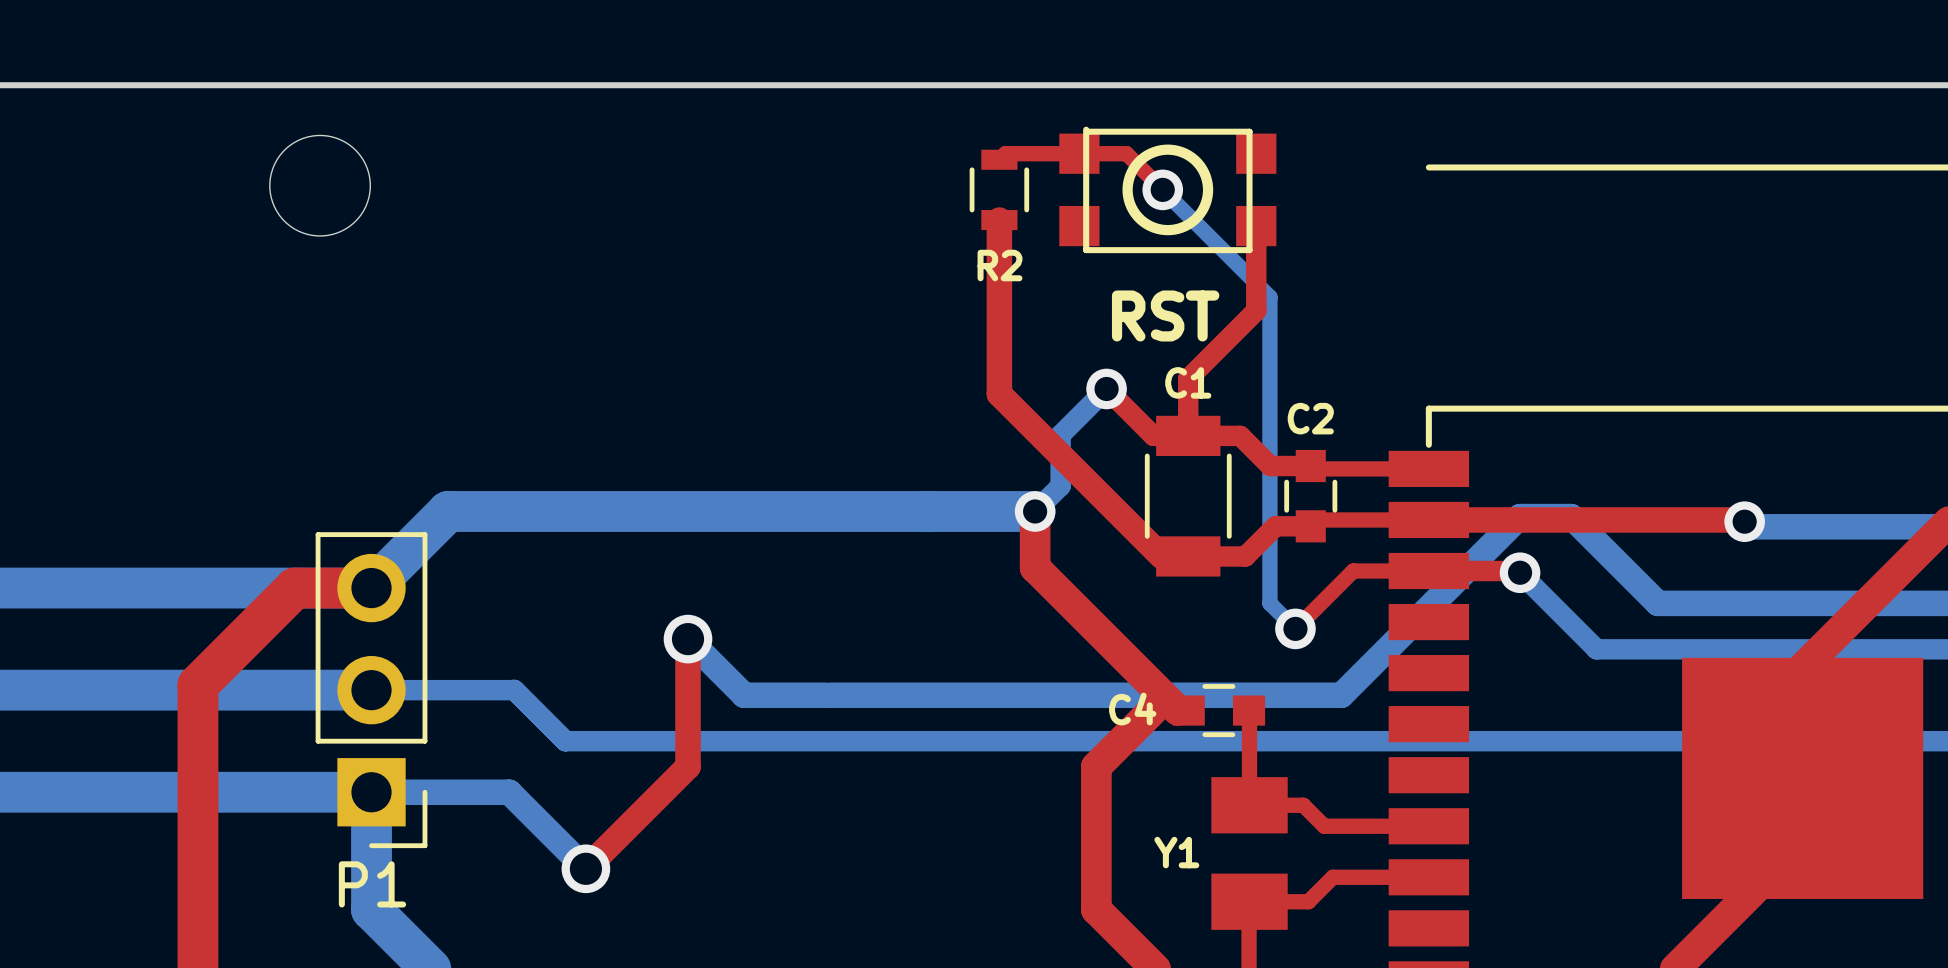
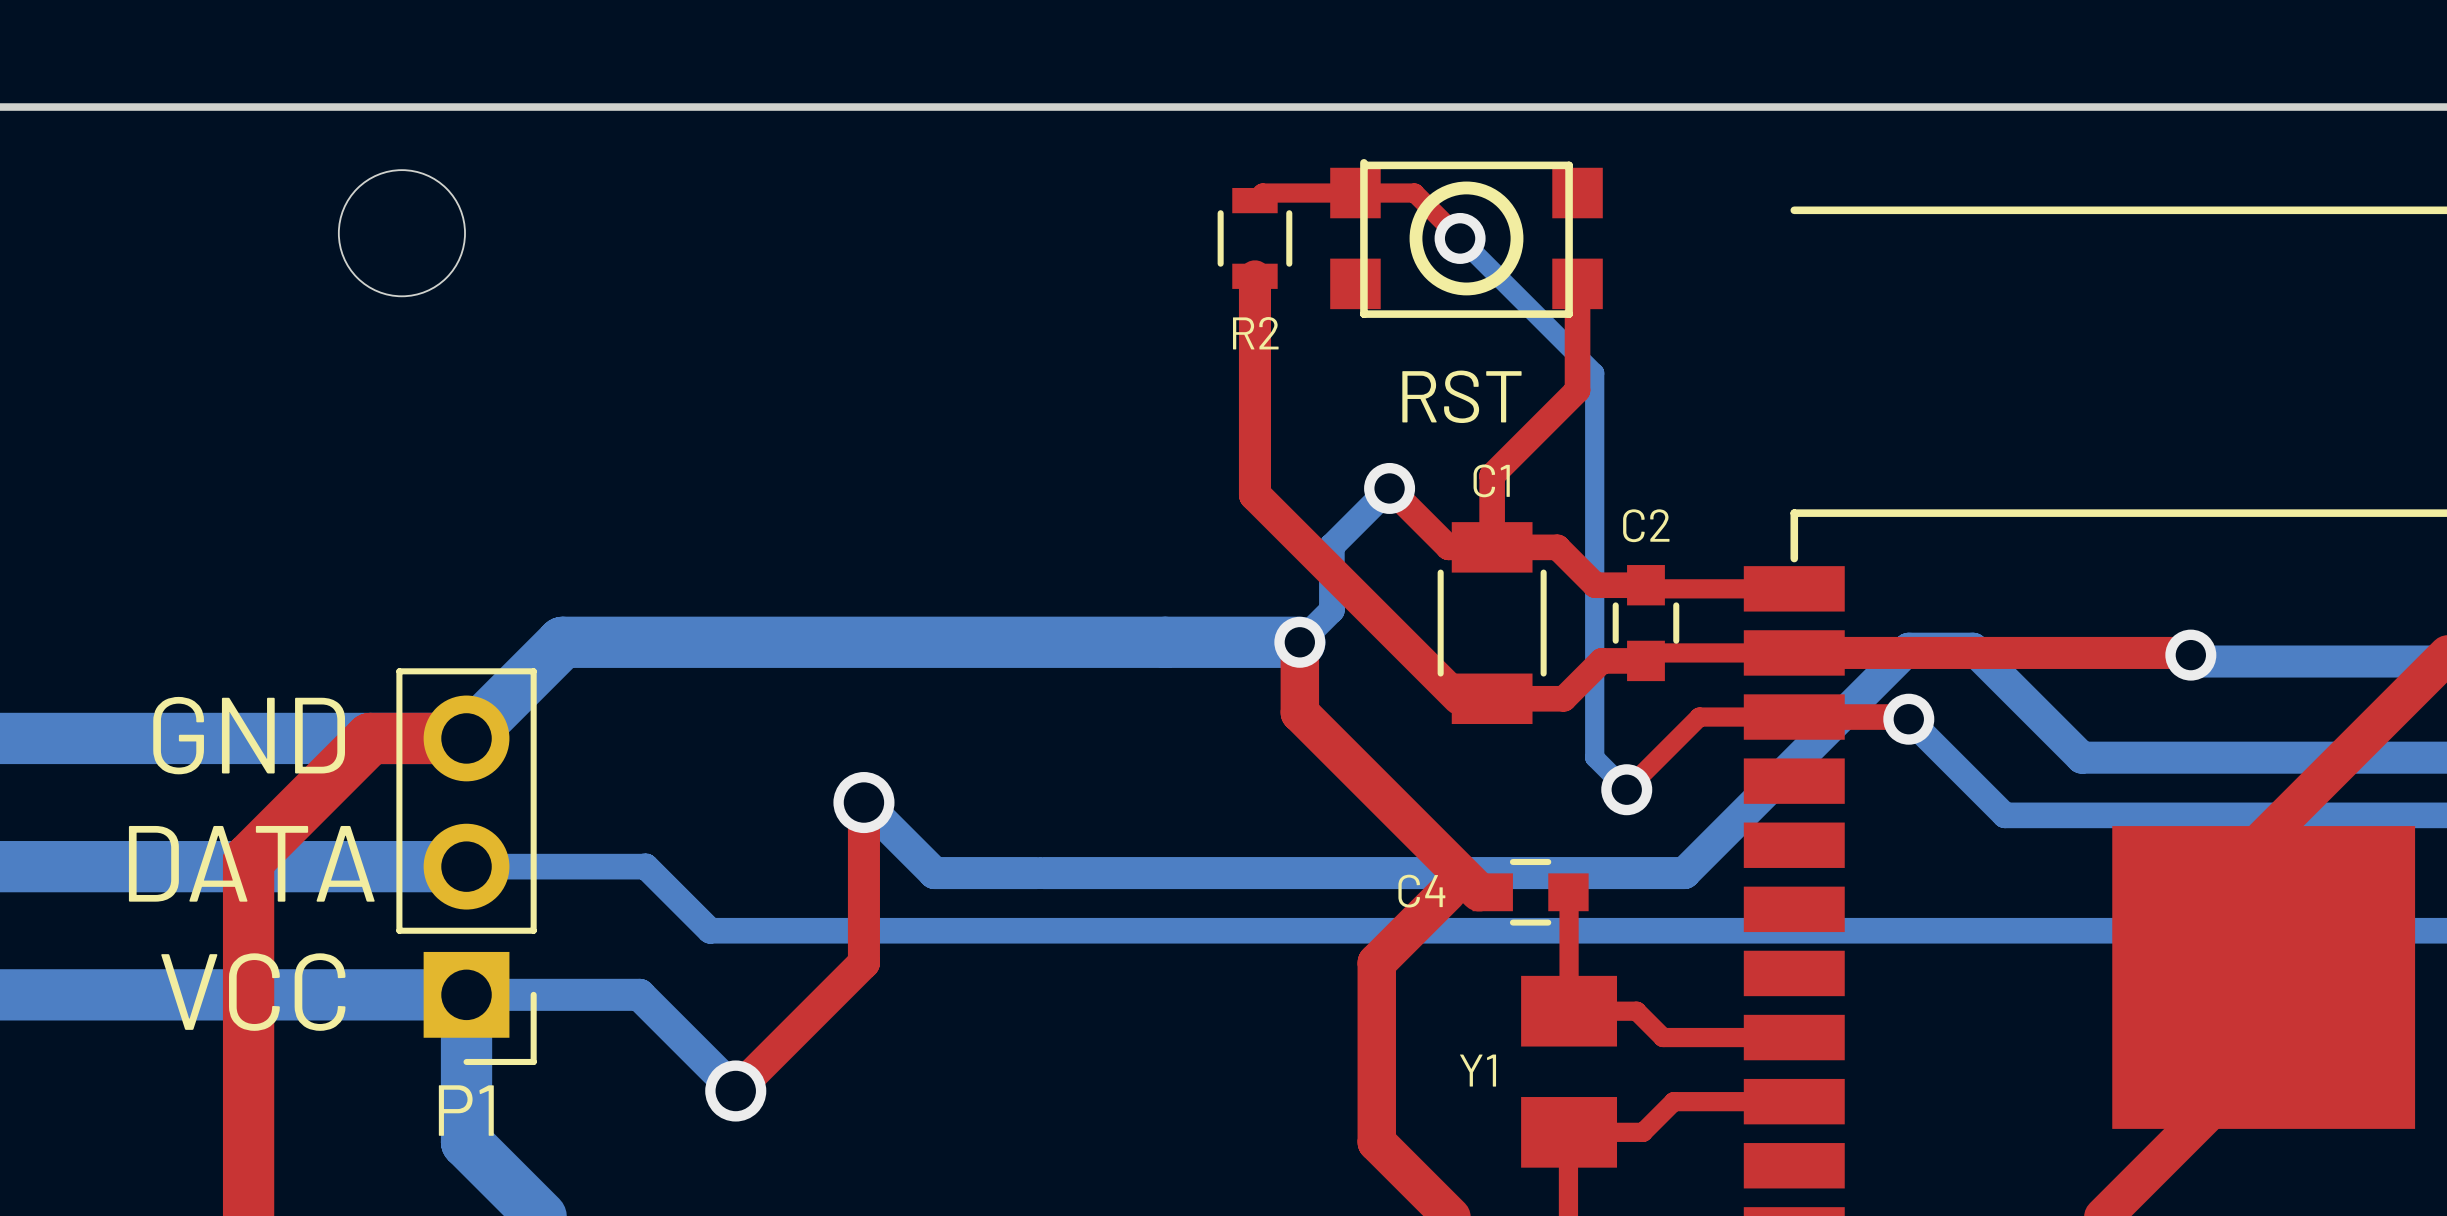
text: none -> GND (249, 735)
text: none -> DATA (251, 863)
text: none -> VCC (253, 992)

